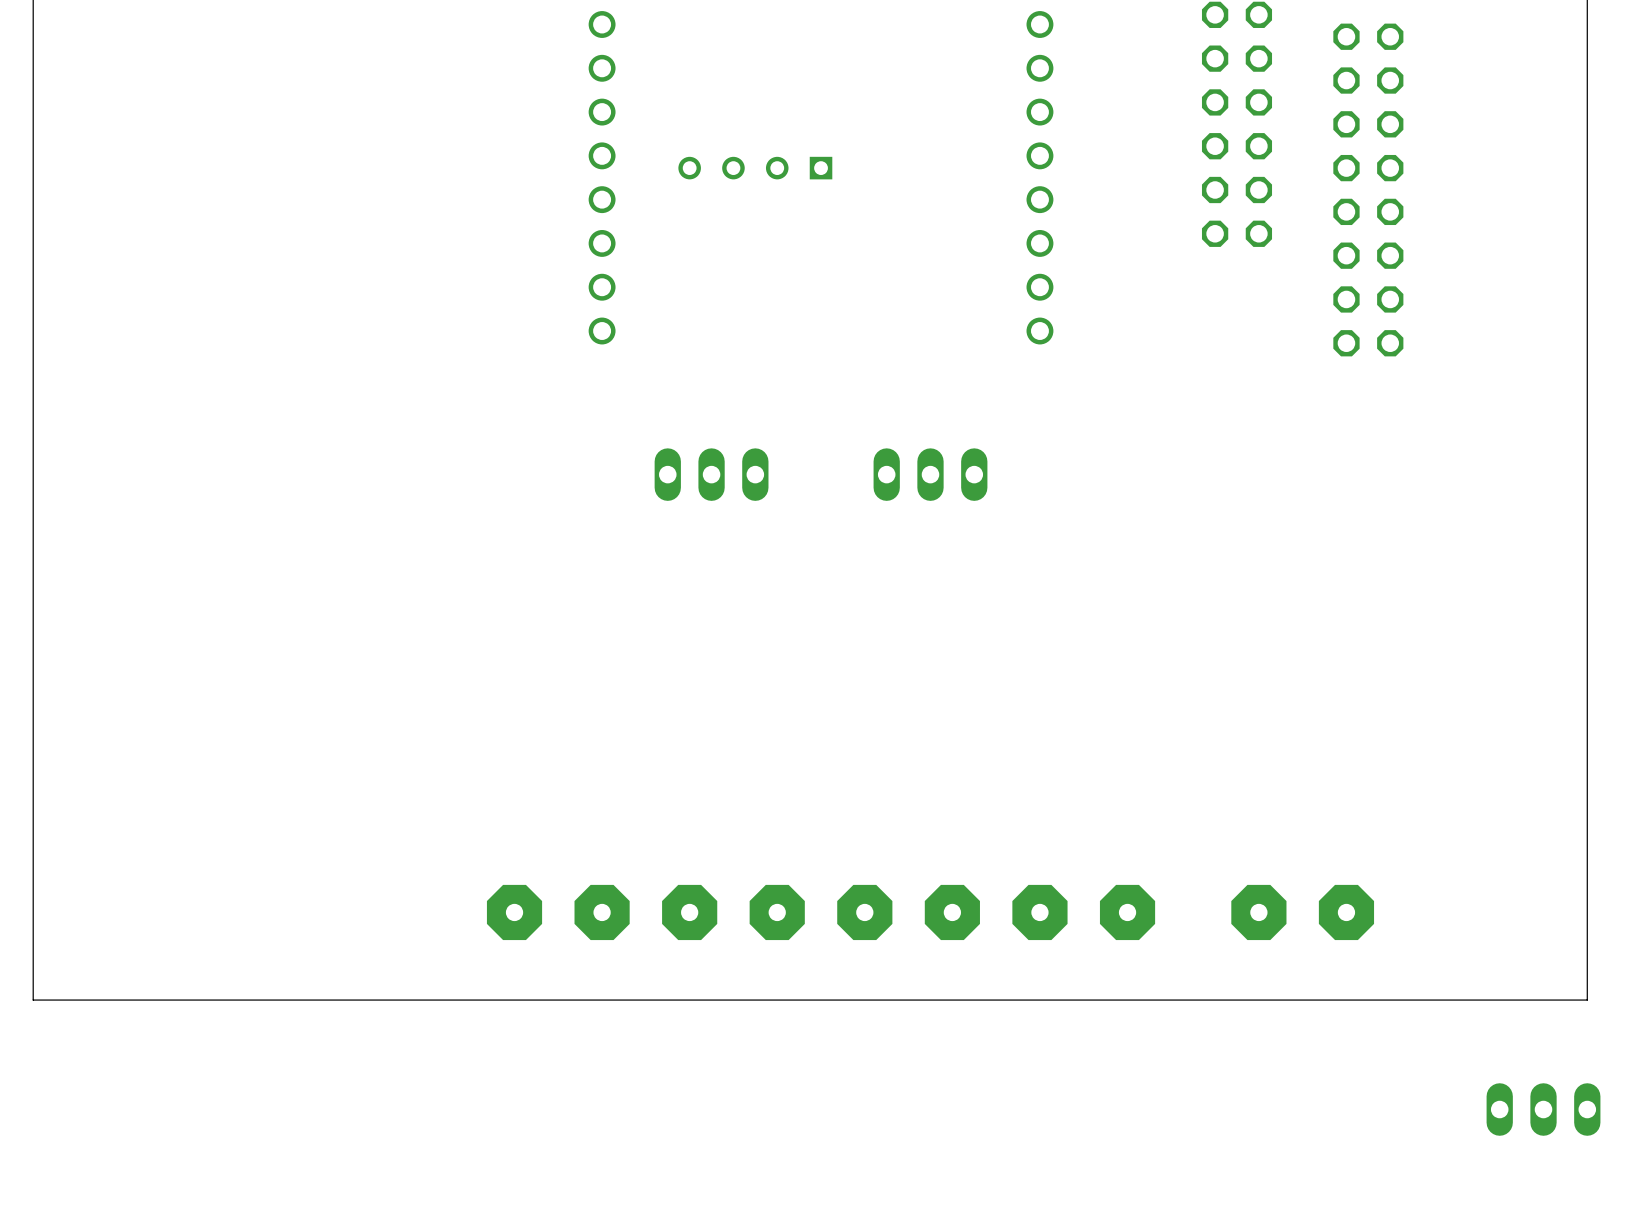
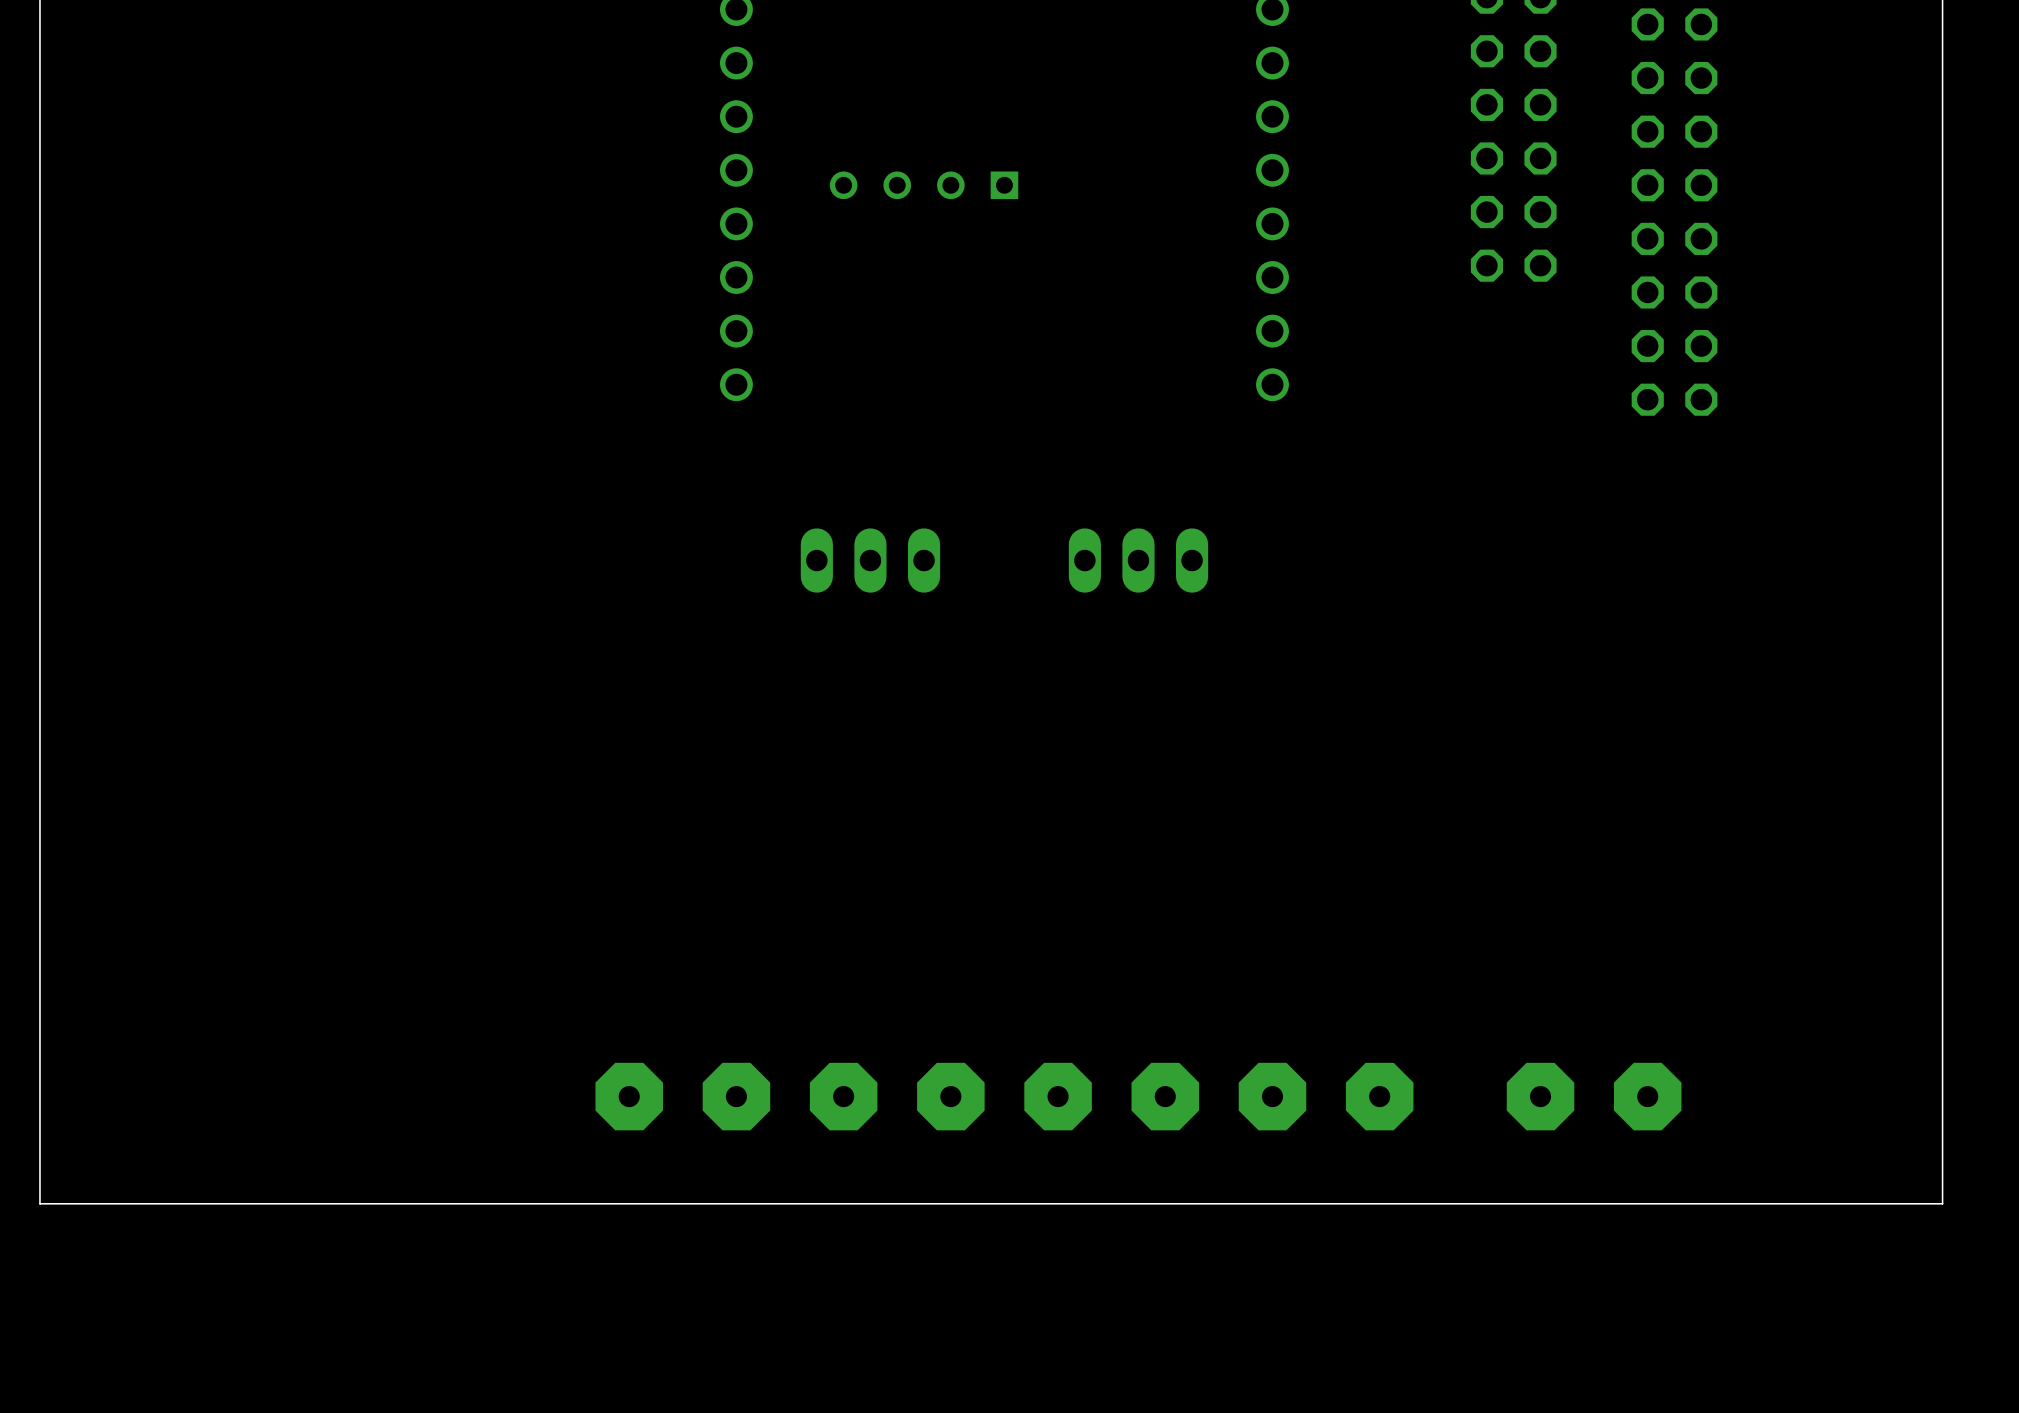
part: (1543, 1109) -> none

